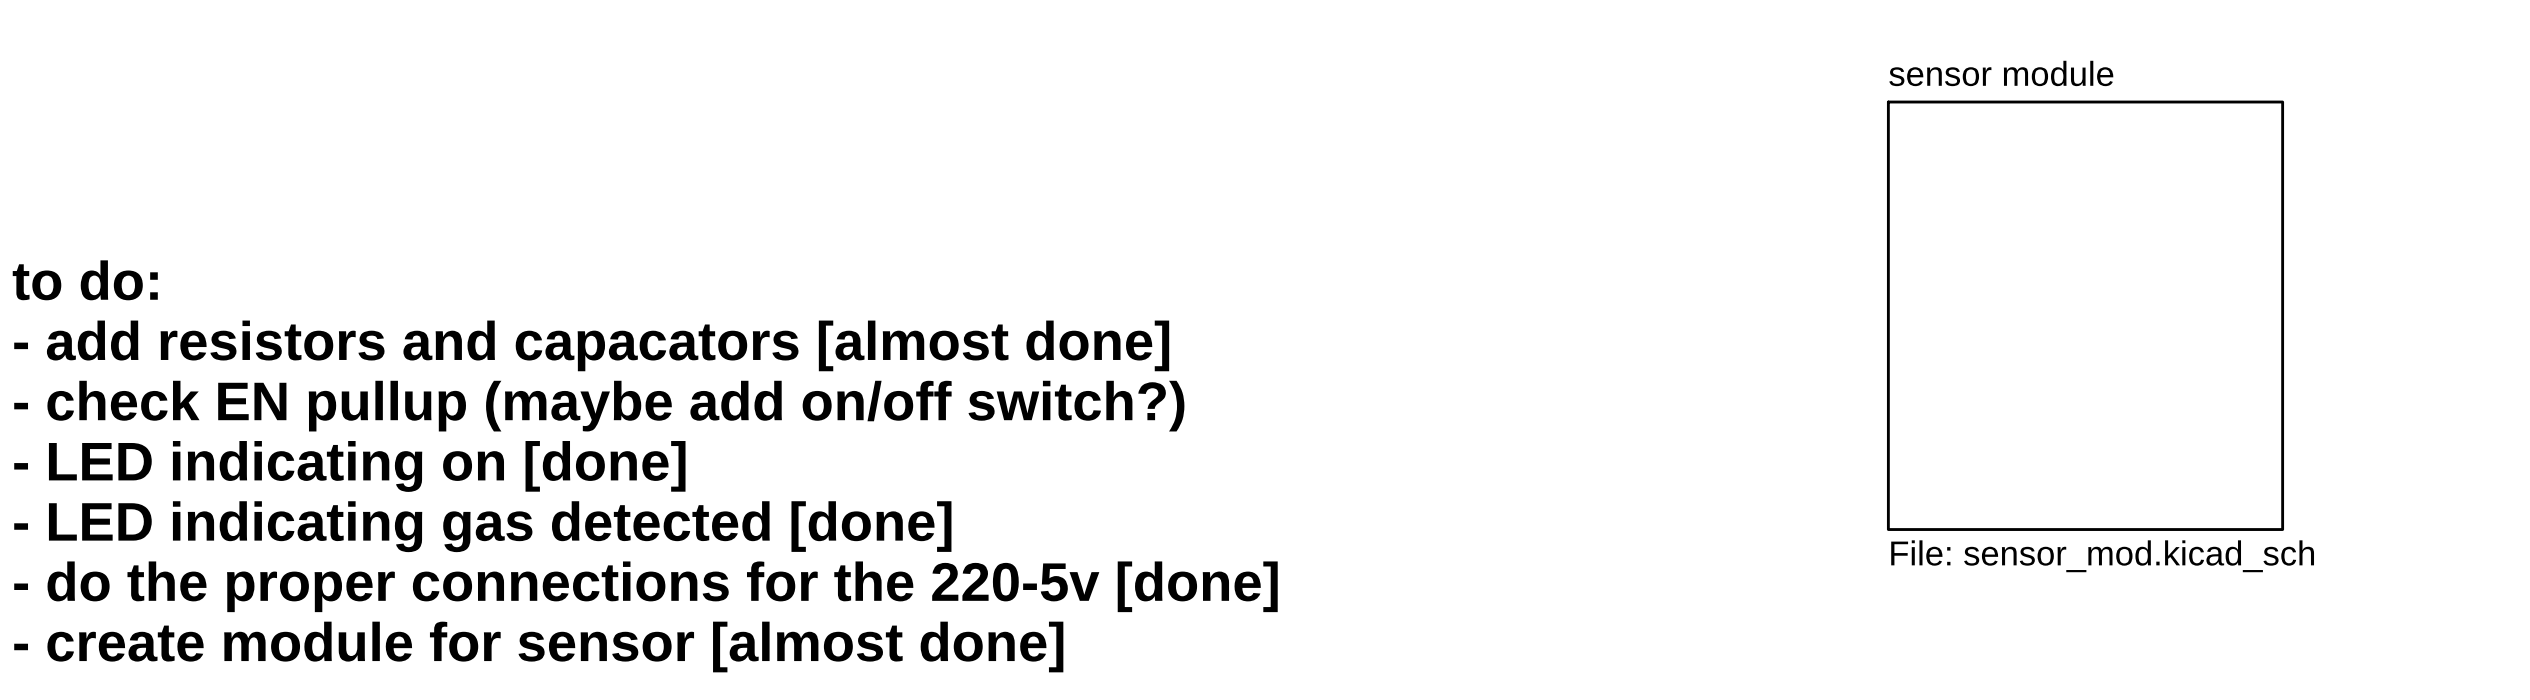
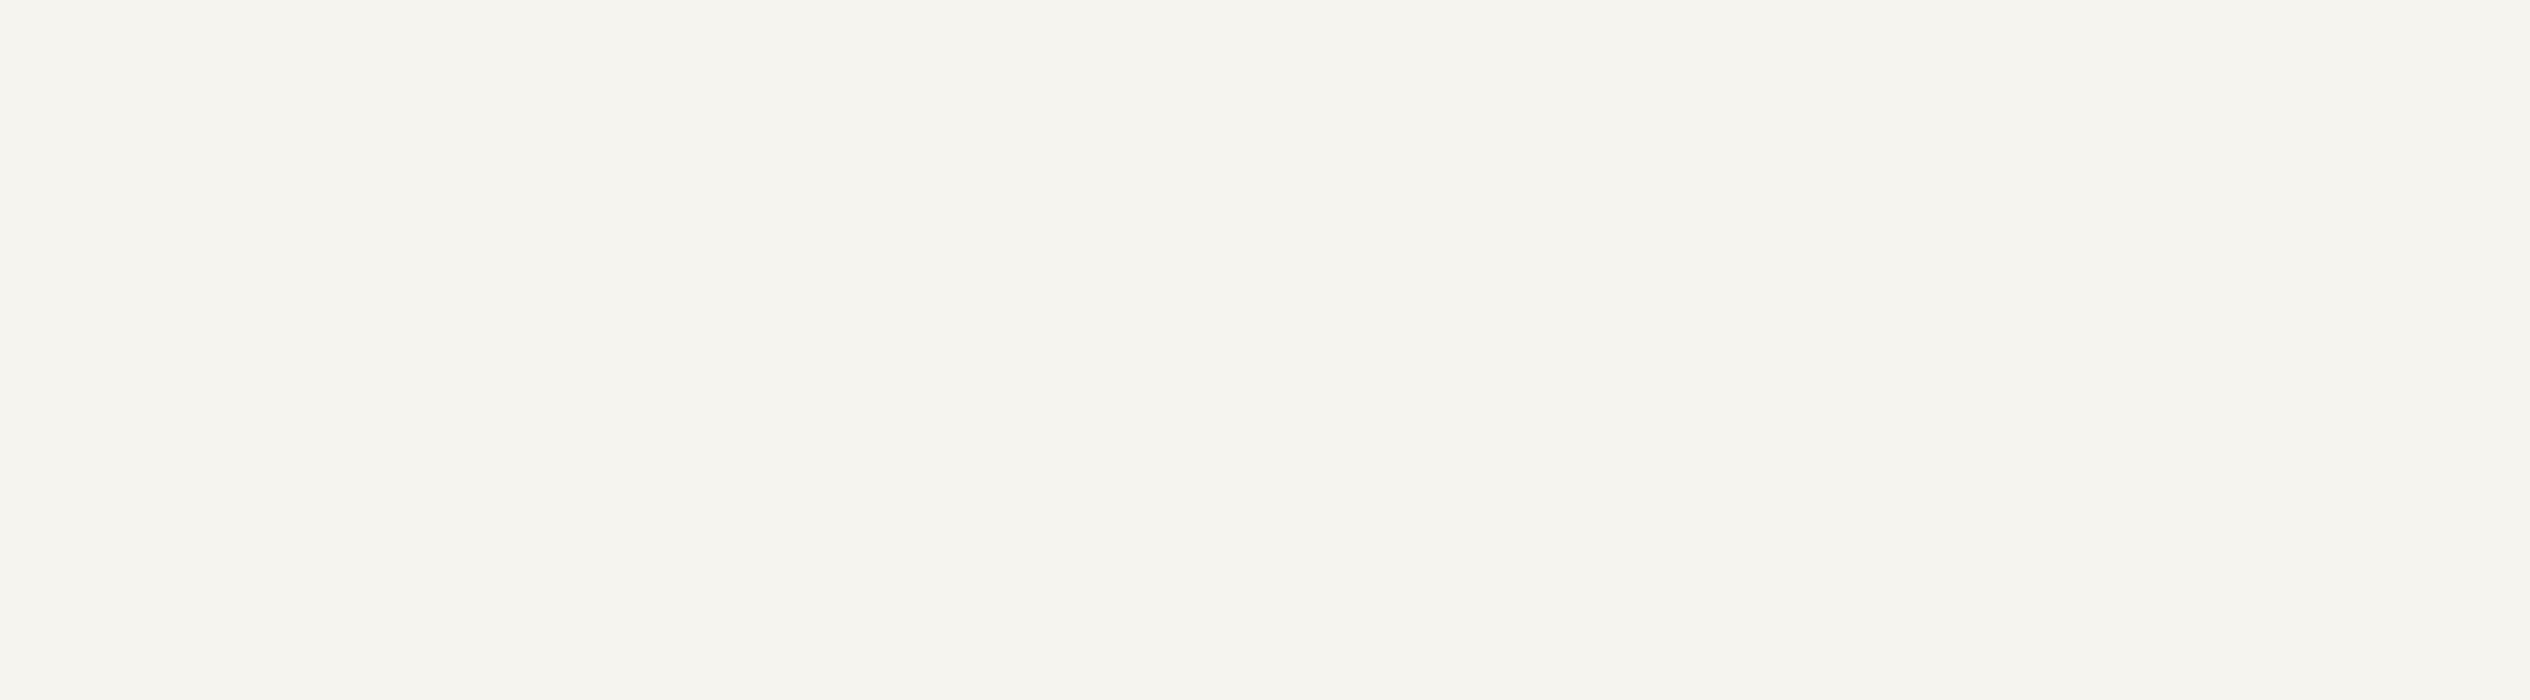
text: to do: (85, 280) -> none
sheet sensor module: File: sensor_mod.kicad_sch (2085, 315) -> none
text: - add resistors and capacators [almost done] (591, 345) -> none
text: - check EN pullup (maybe add on/off switch?) (599, 406) -> none
text: - LED indicating on [done] (349, 466) -> none
text: - LED indicating gas detected [done] (482, 526) -> none
text: - do the proper connections for the 220-5v [done] (645, 586) -> none
text: - create module for sensor [almost done] (538, 647) -> none

